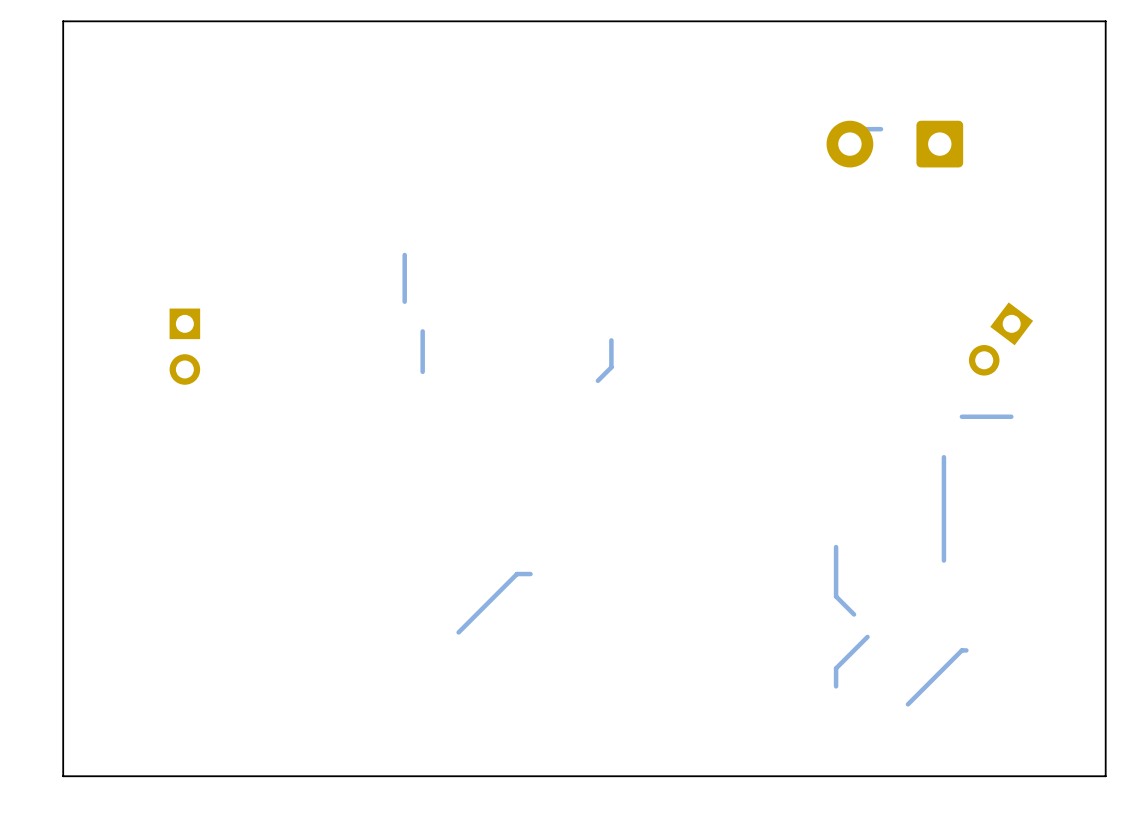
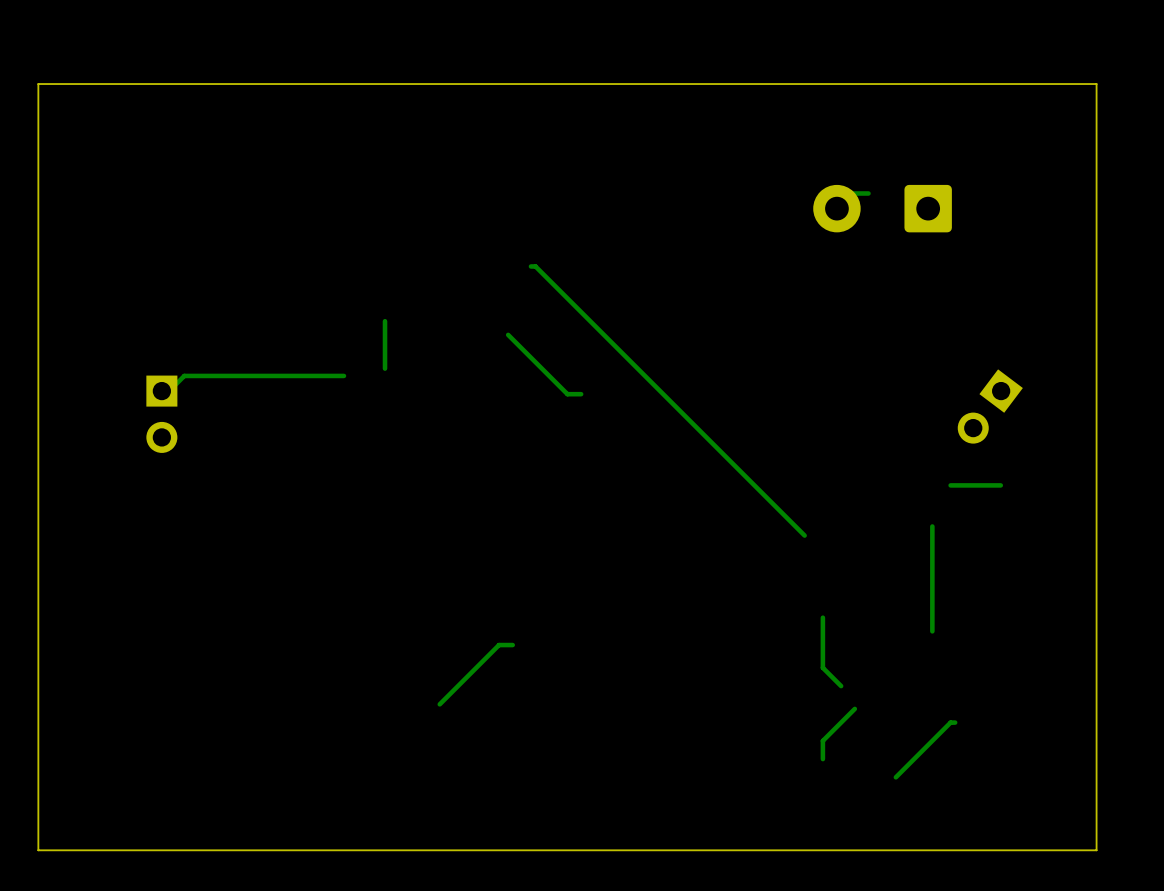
track: none -> (530, 266) (535, 266) (804, 535)
track: none -> (508, 334) (567, 394) (581, 394)
track: none -> (343, 375) (184, 375) (166, 394)
track: (422, 331) (422, 371) -> none
track: (611, 340) (611, 367) (597, 380) -> none

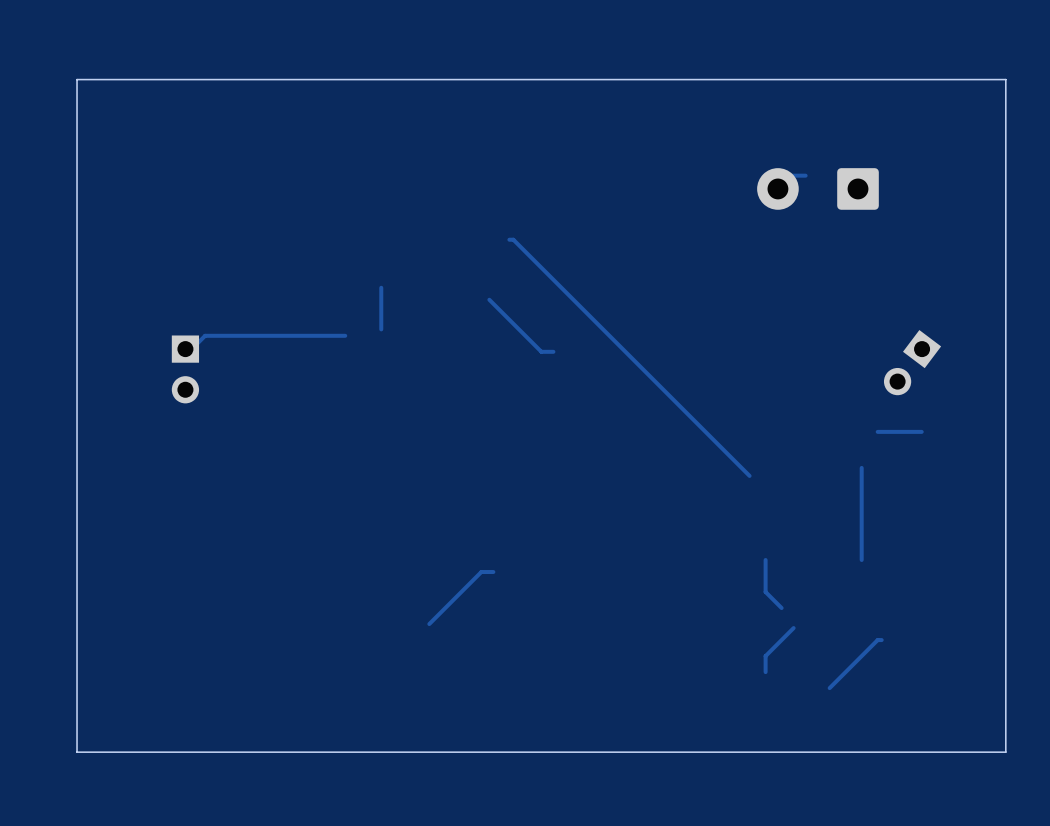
track: (822, 617) (822, 631) -> none

